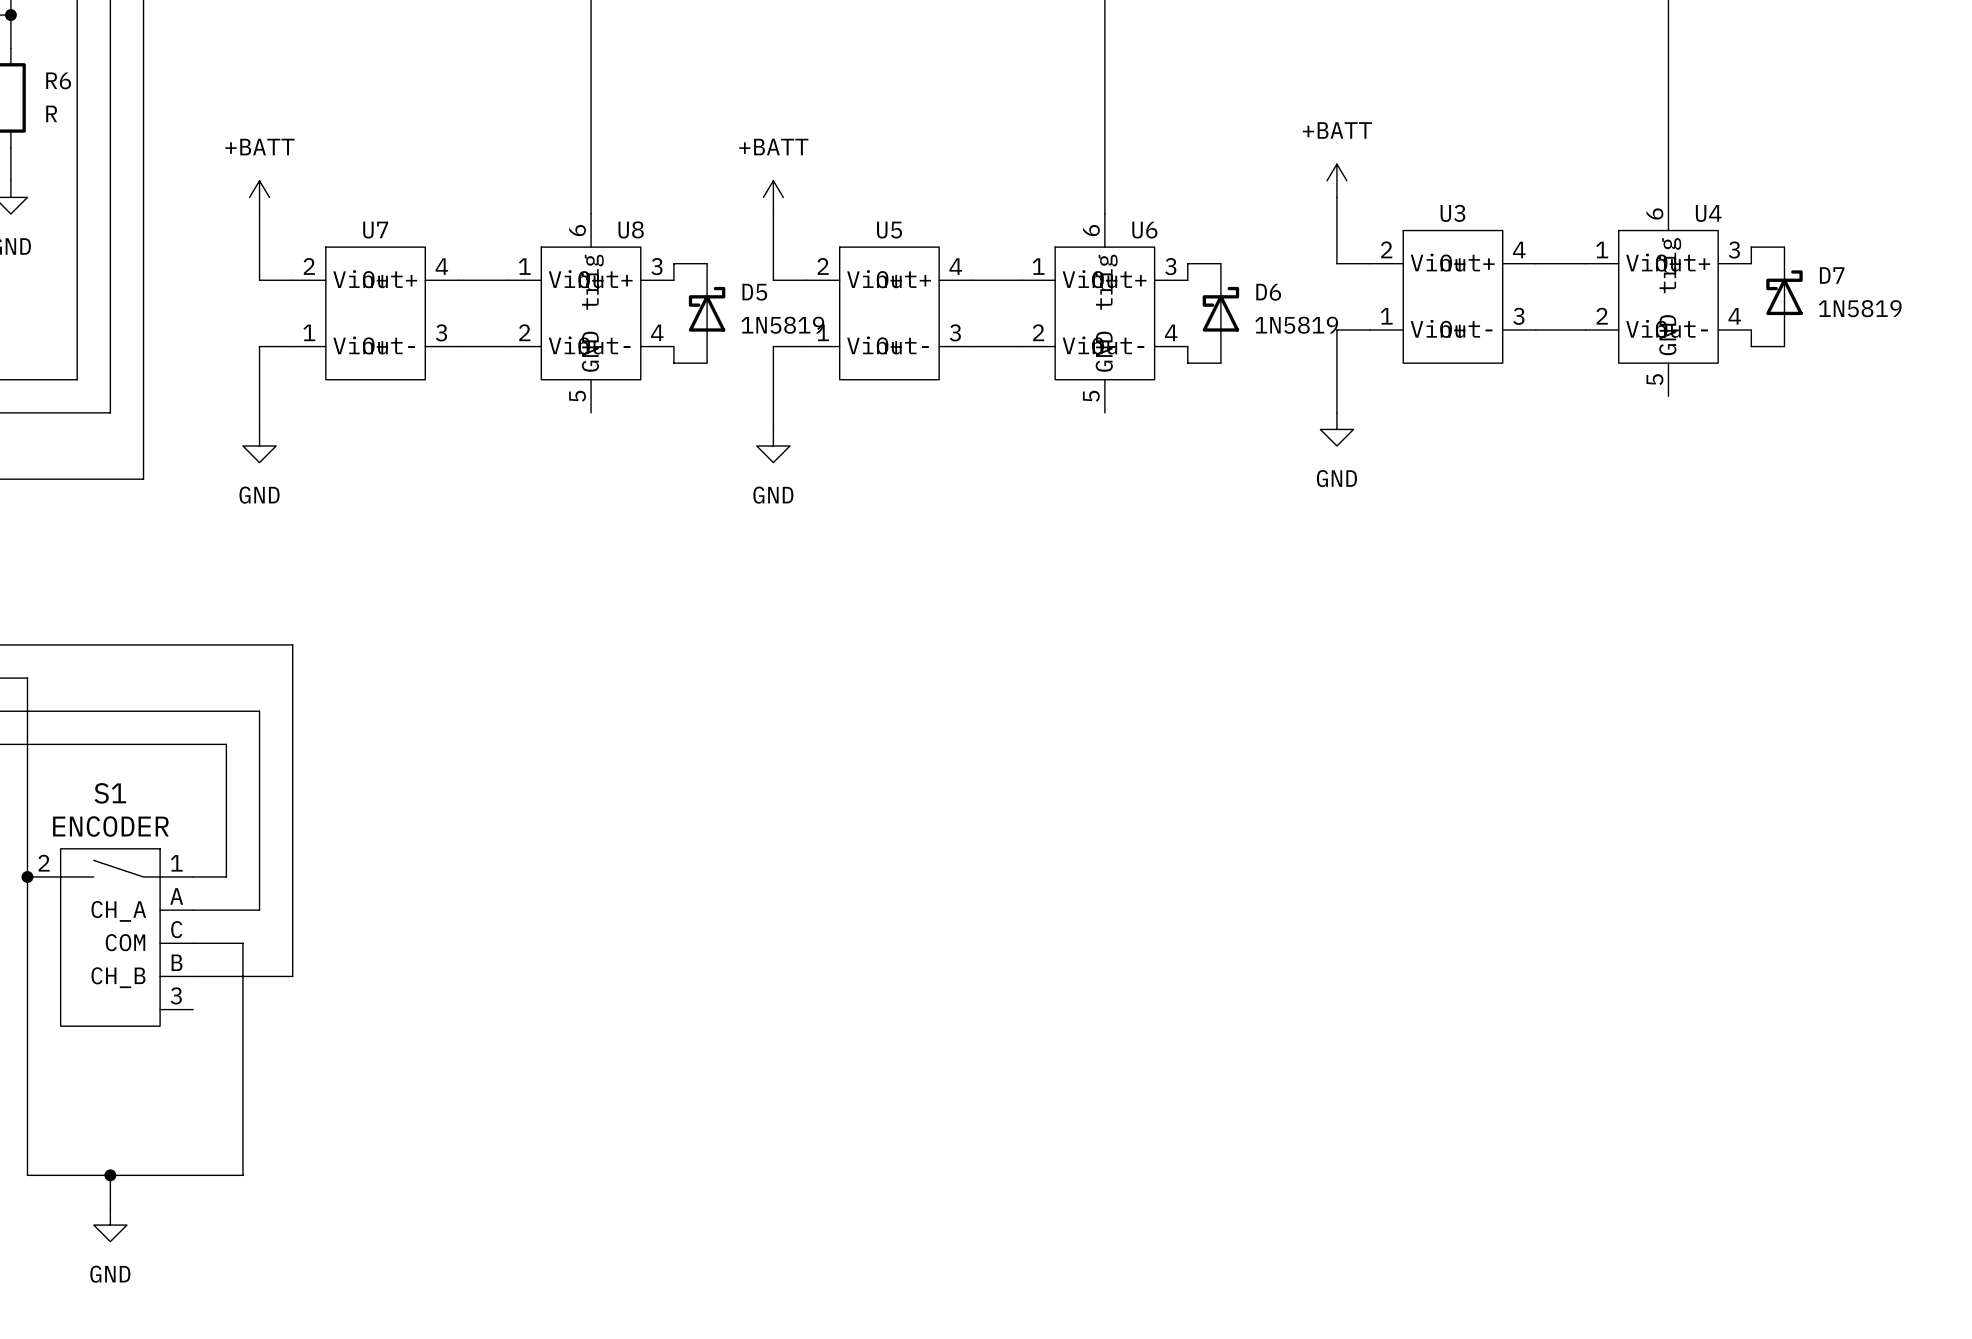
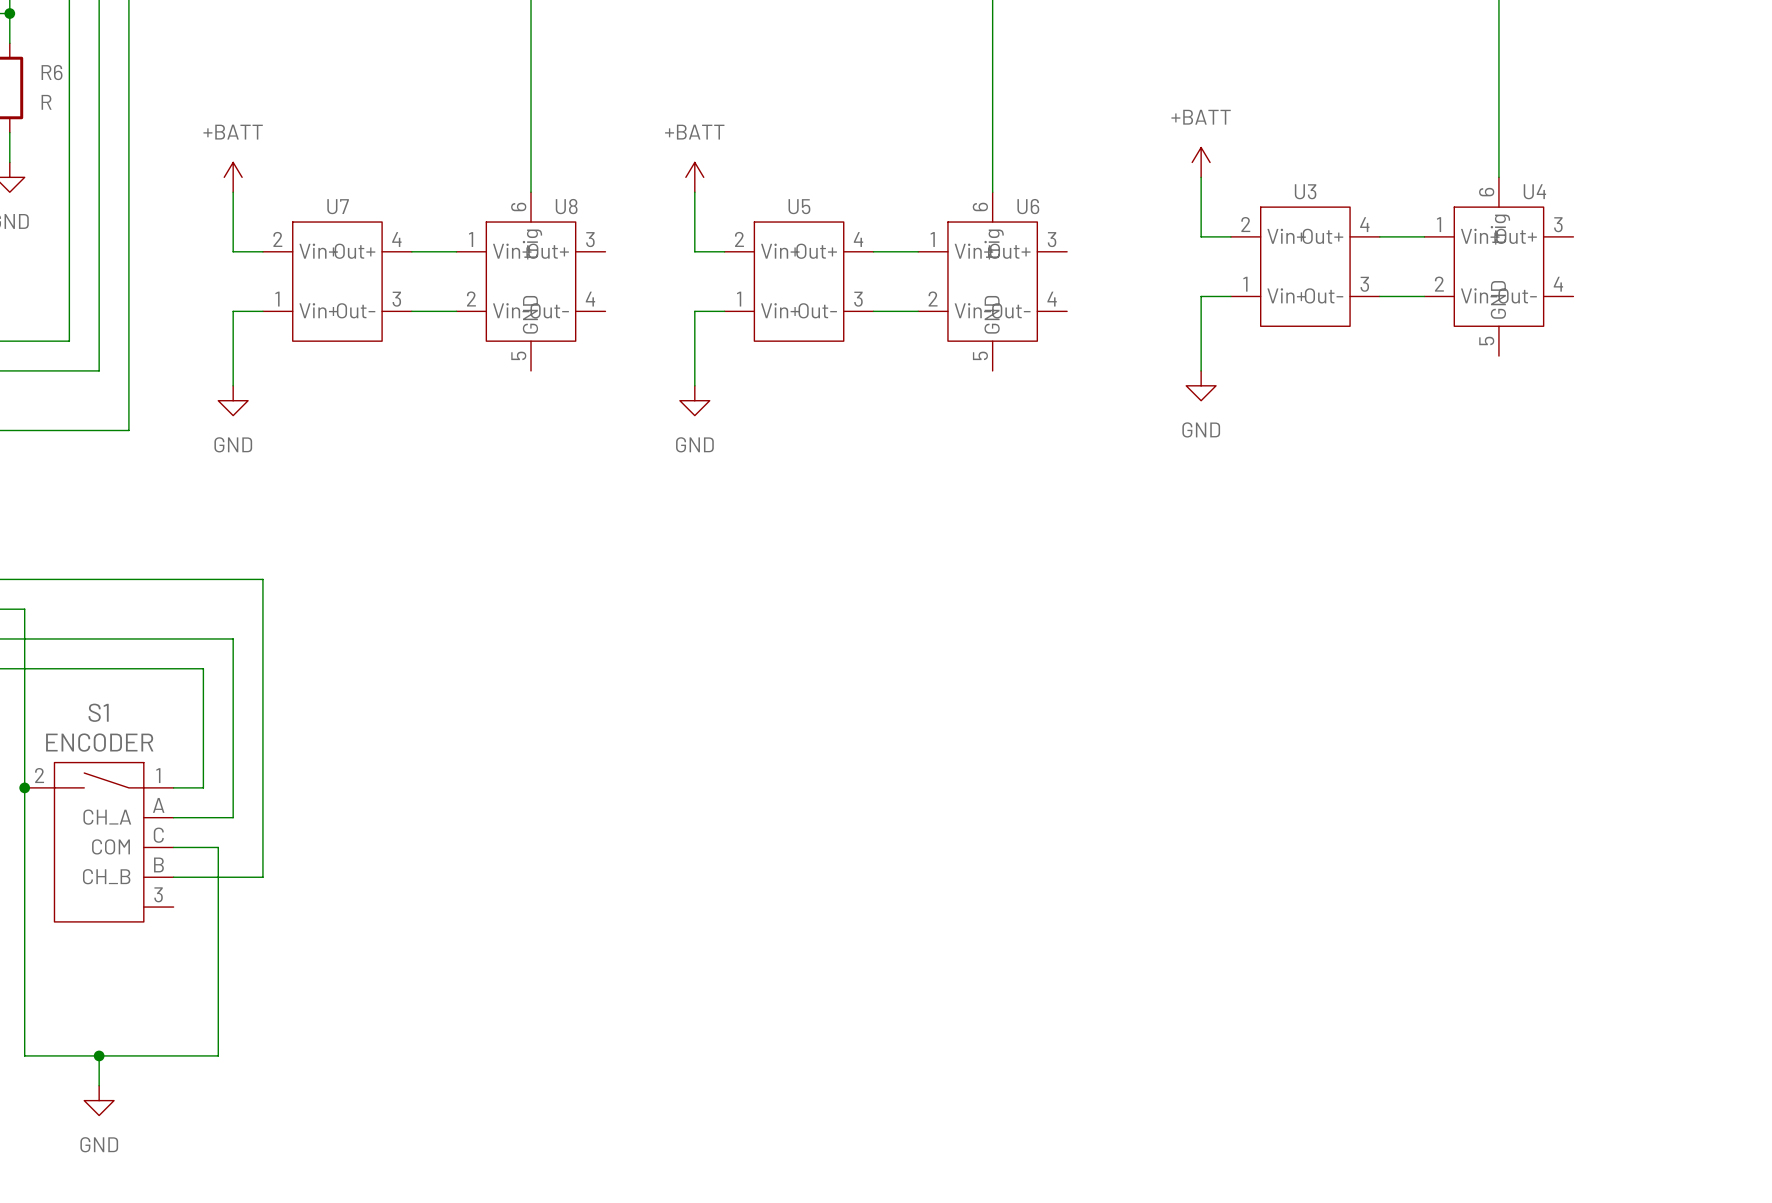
wire: (1784, 247) (1751, 247) (1751, 263) -> none
wire: (707, 263) (673, 263) (673, 280) -> none
wire: (1220, 263) (1187, 263) (1187, 280) -> none
D7: 1N5819 (1784, 296) -> none
D5: 1N5819 (707, 313) -> none
D6: 1N5819 (1220, 313) -> none
wire: (1751, 329) (1751, 346) (1784, 346) -> none
wire: (673, 346) (673, 363) (707, 363) -> none
wire: (1187, 346) (1187, 363) (1220, 363) -> none

